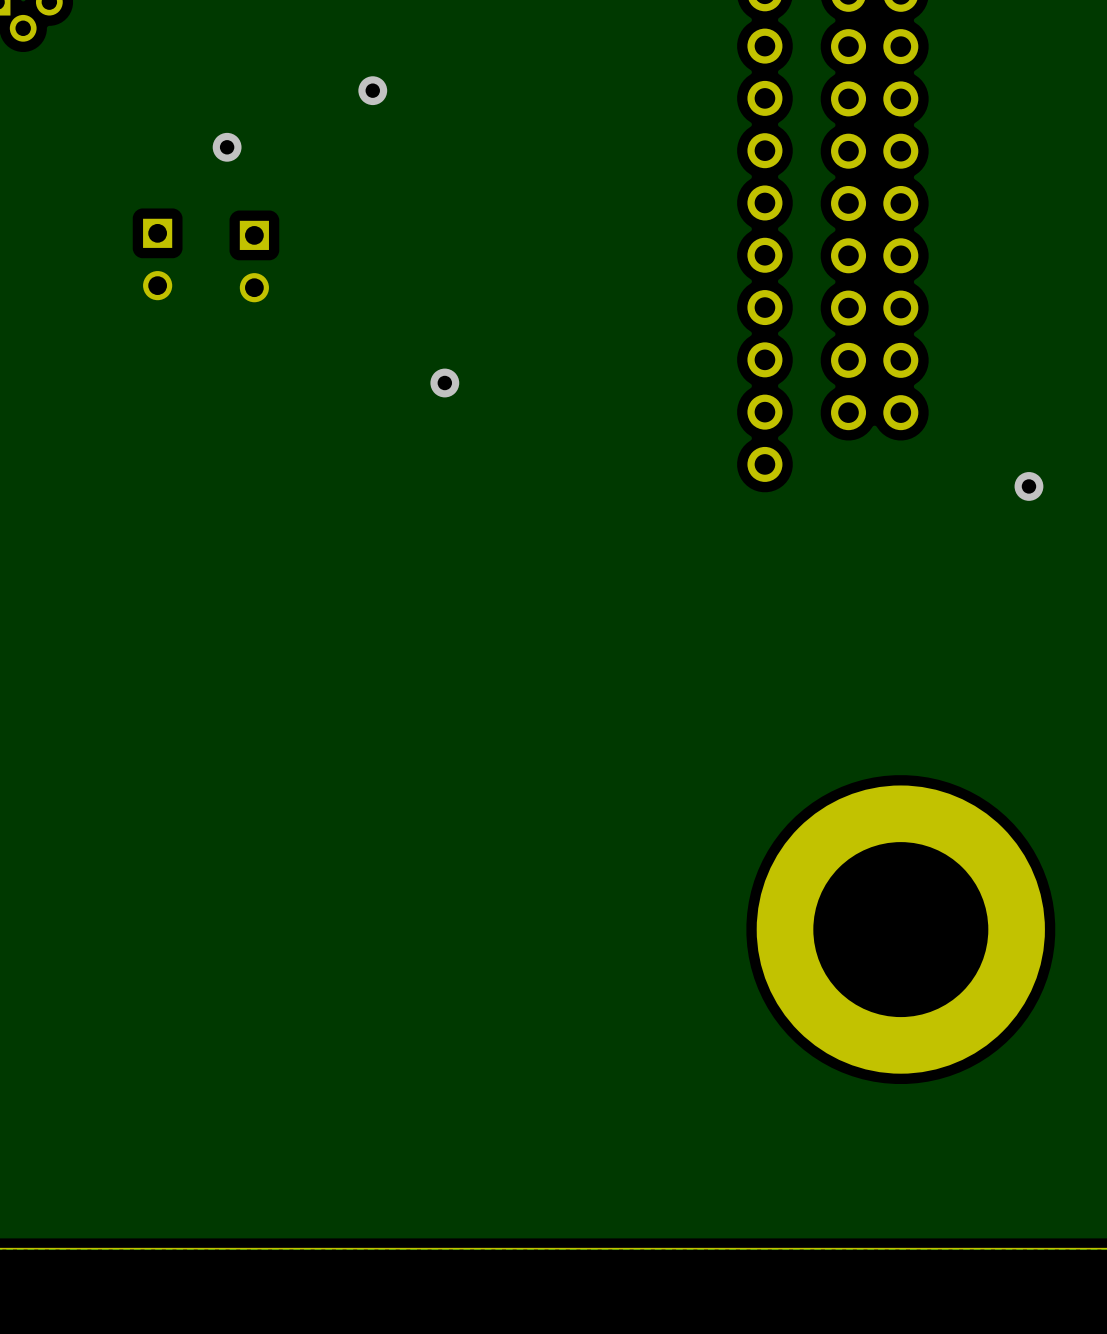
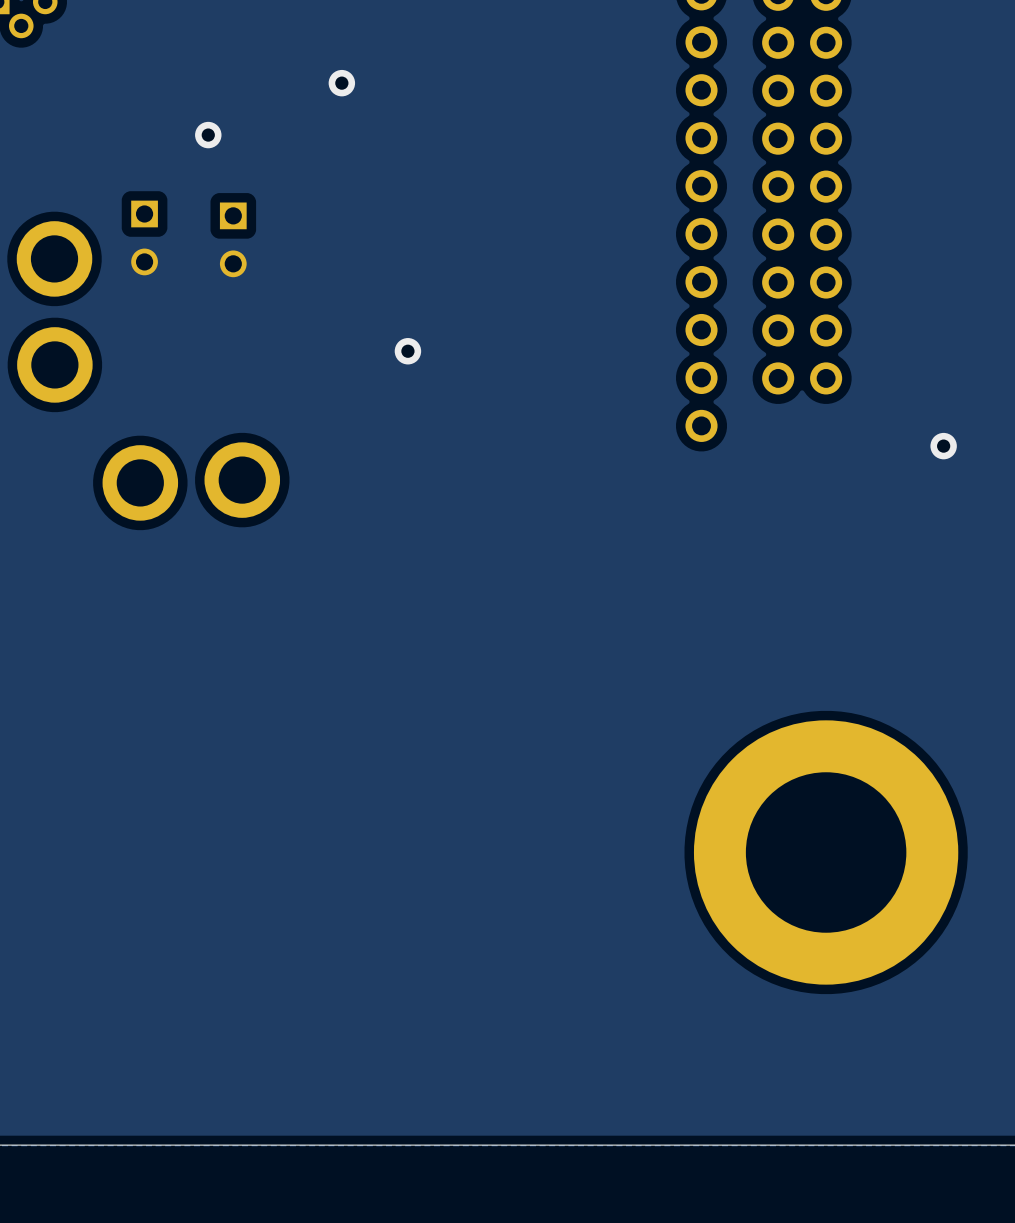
part: none -> (54, 258)
part: none -> (54, 364)
part: none -> (242, 480)
part: none -> (140, 482)

